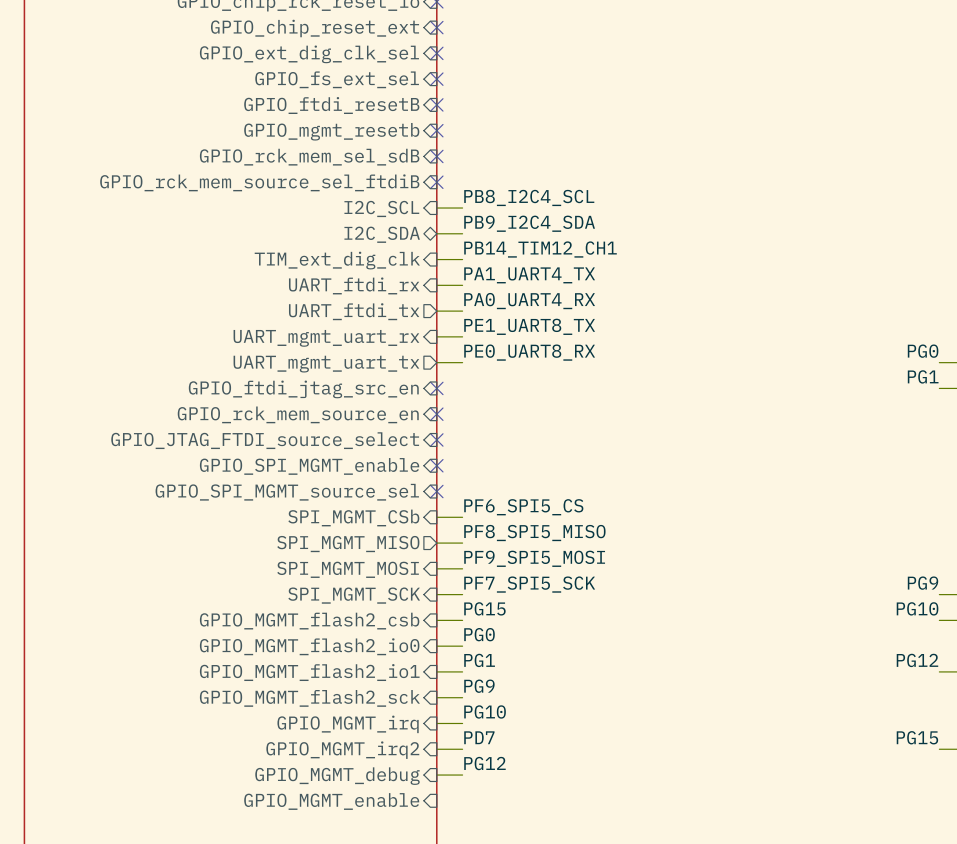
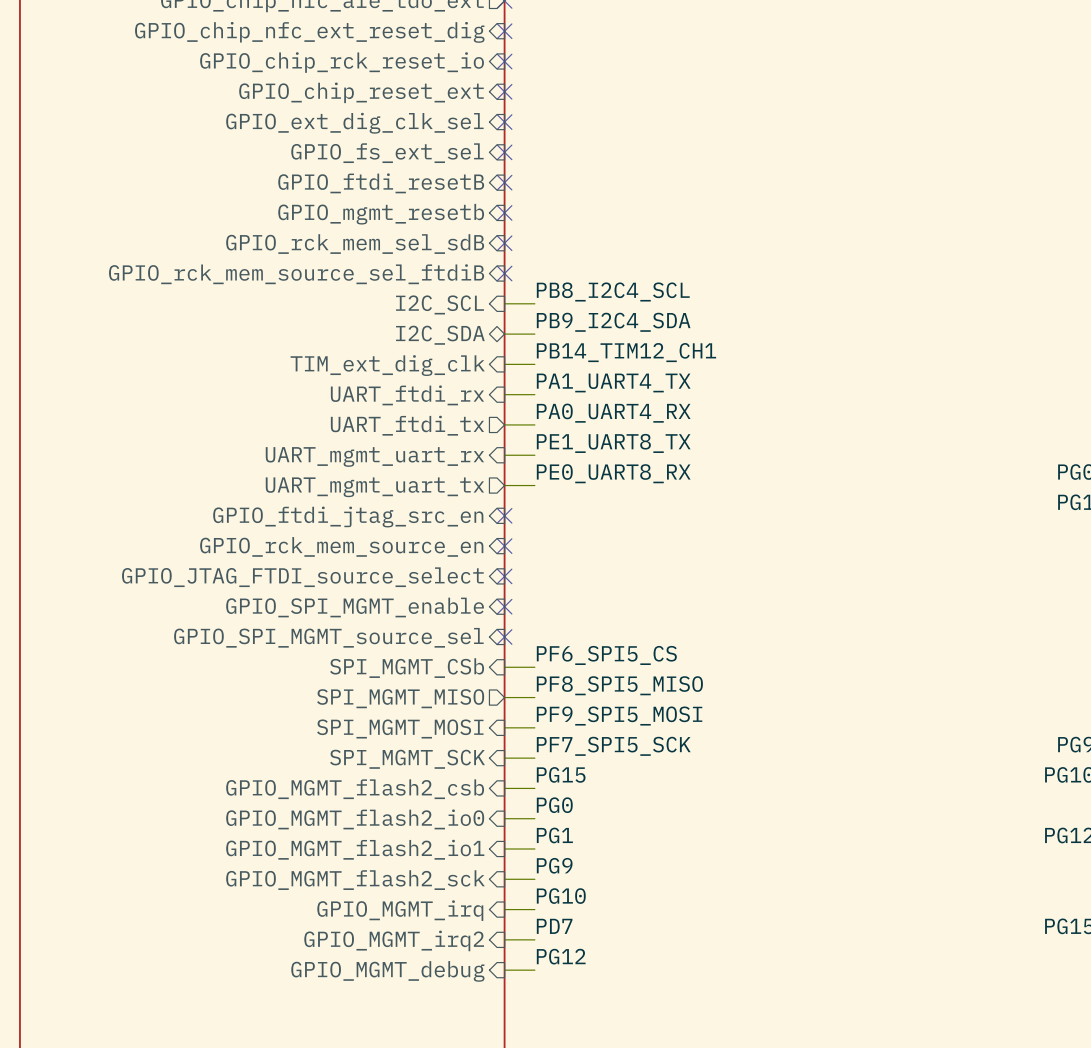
sheet pin: GPIO_MGMT_enable (331, 801) -> none

